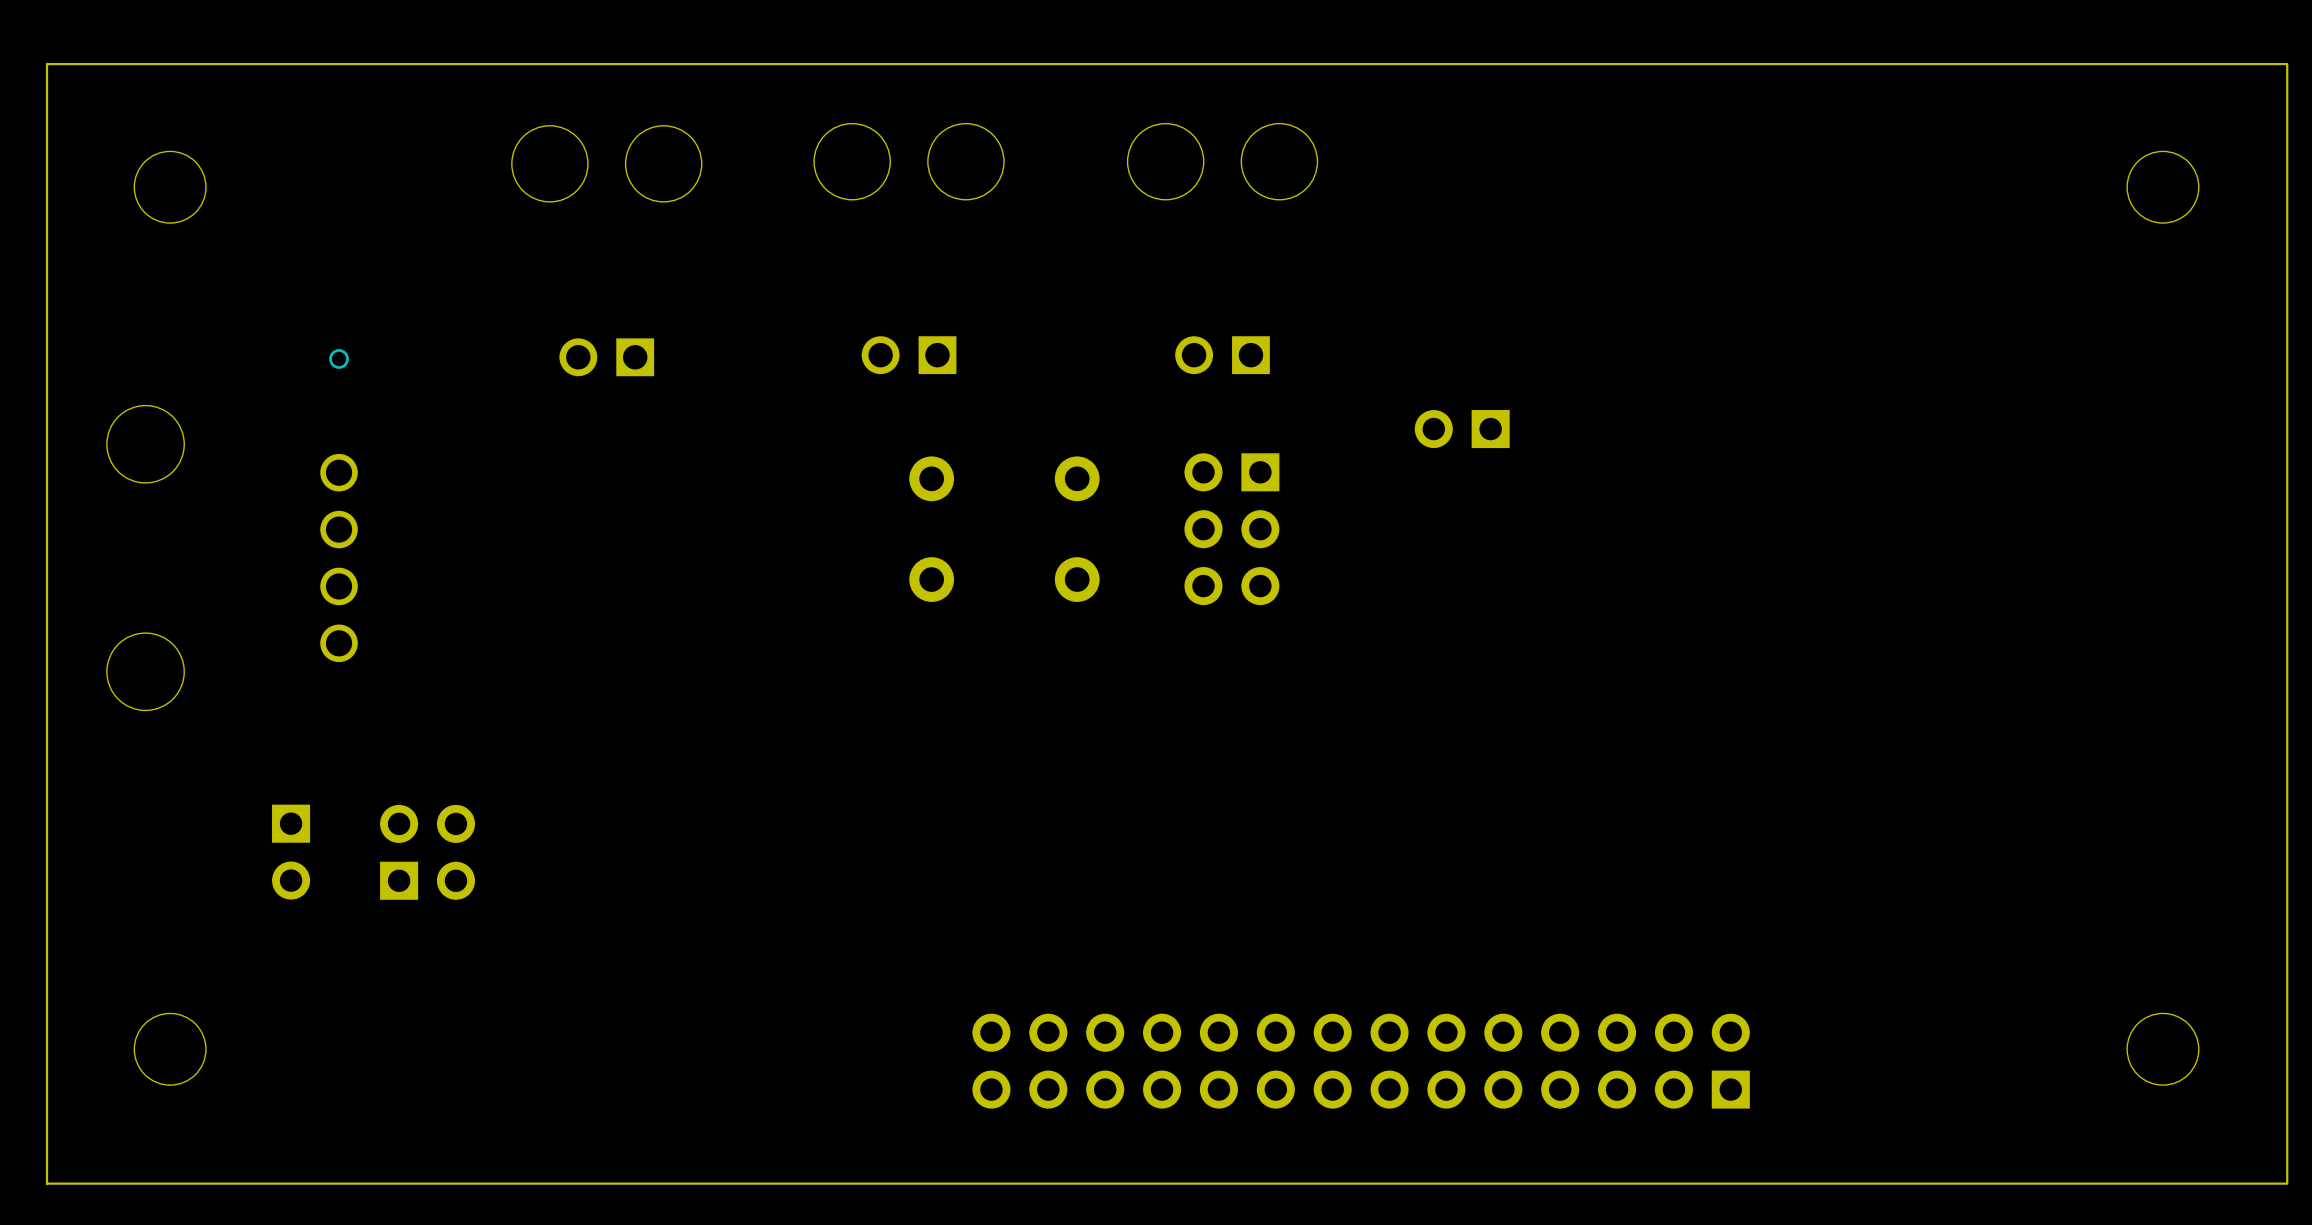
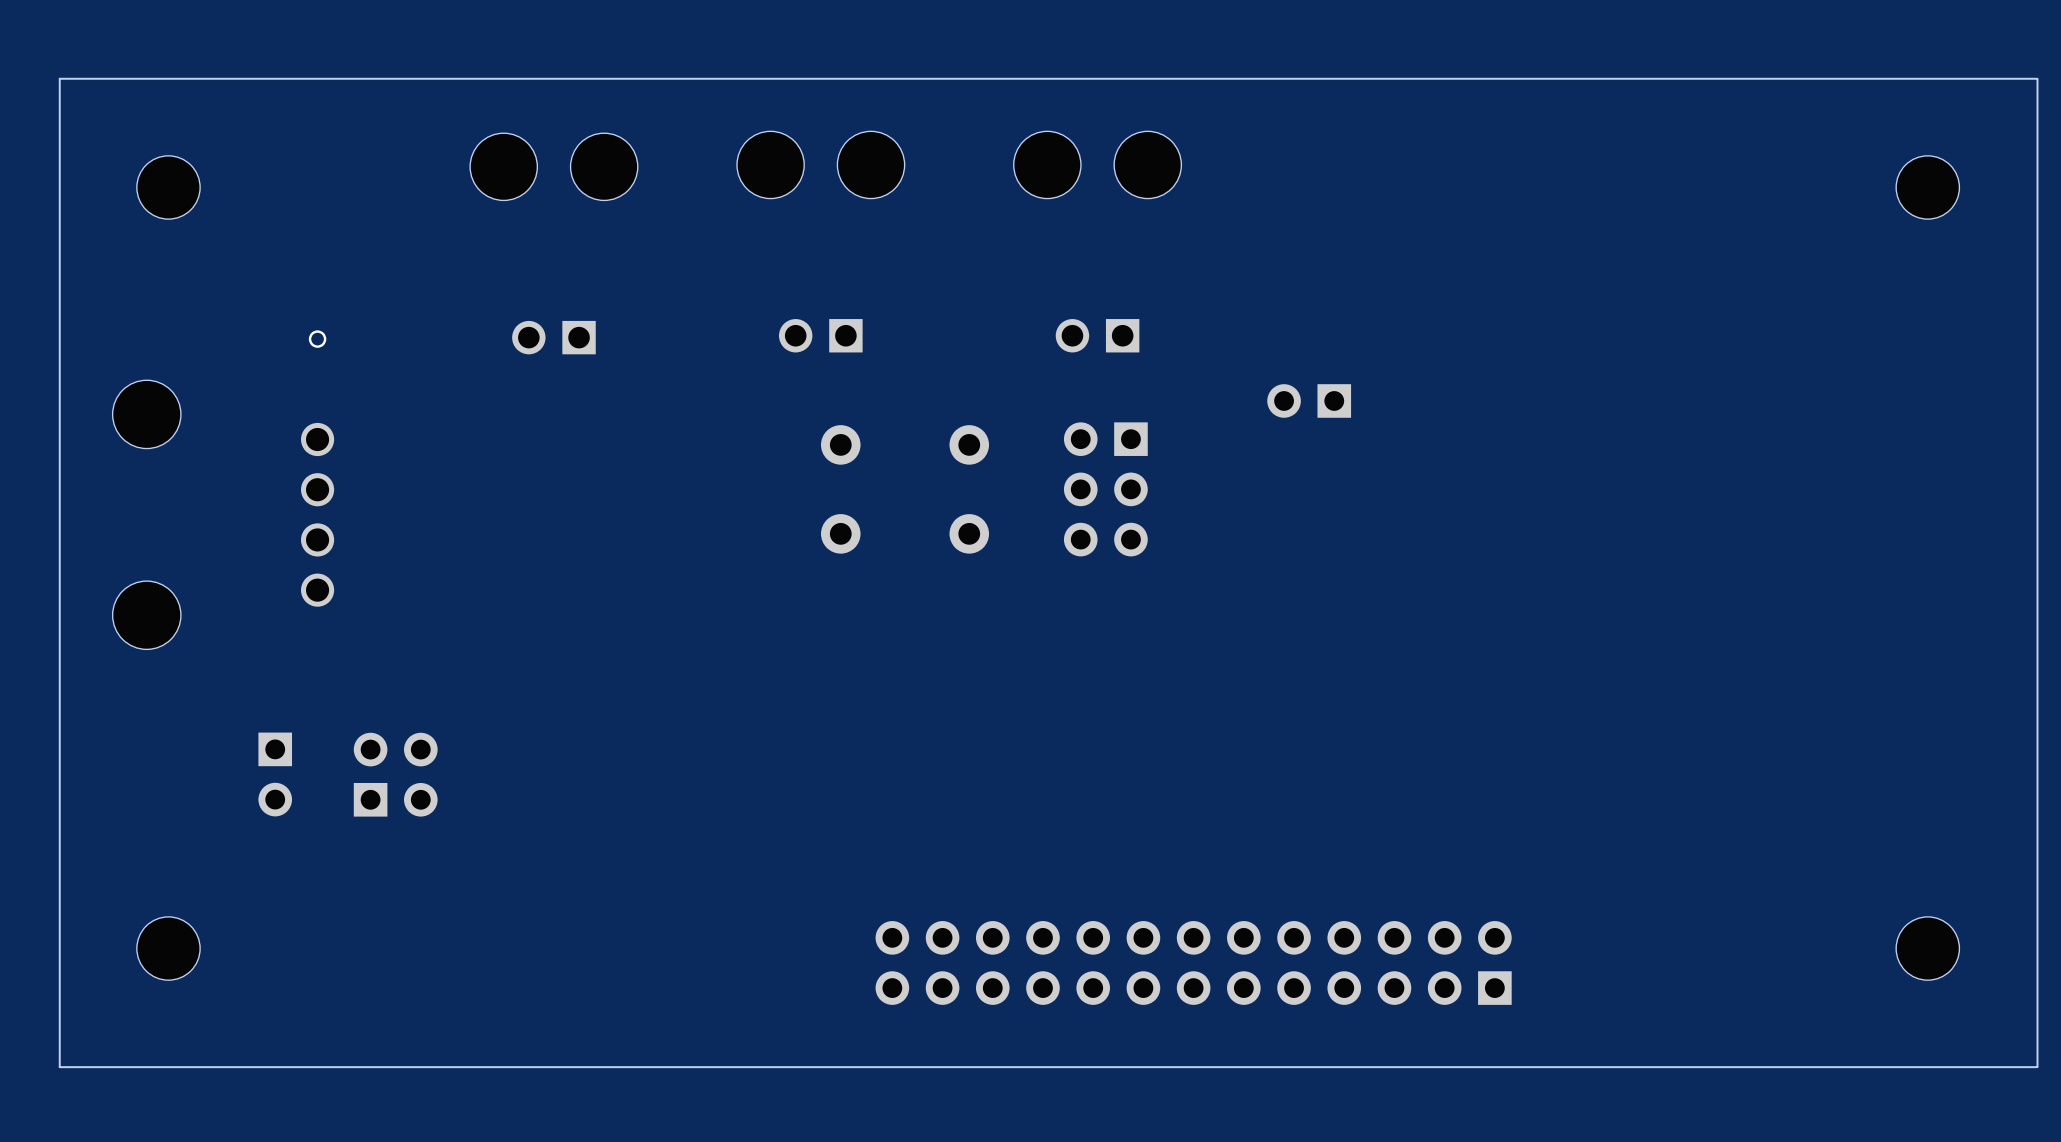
part: (1361, 1061) -> none
part: none -> (1193, 962)

